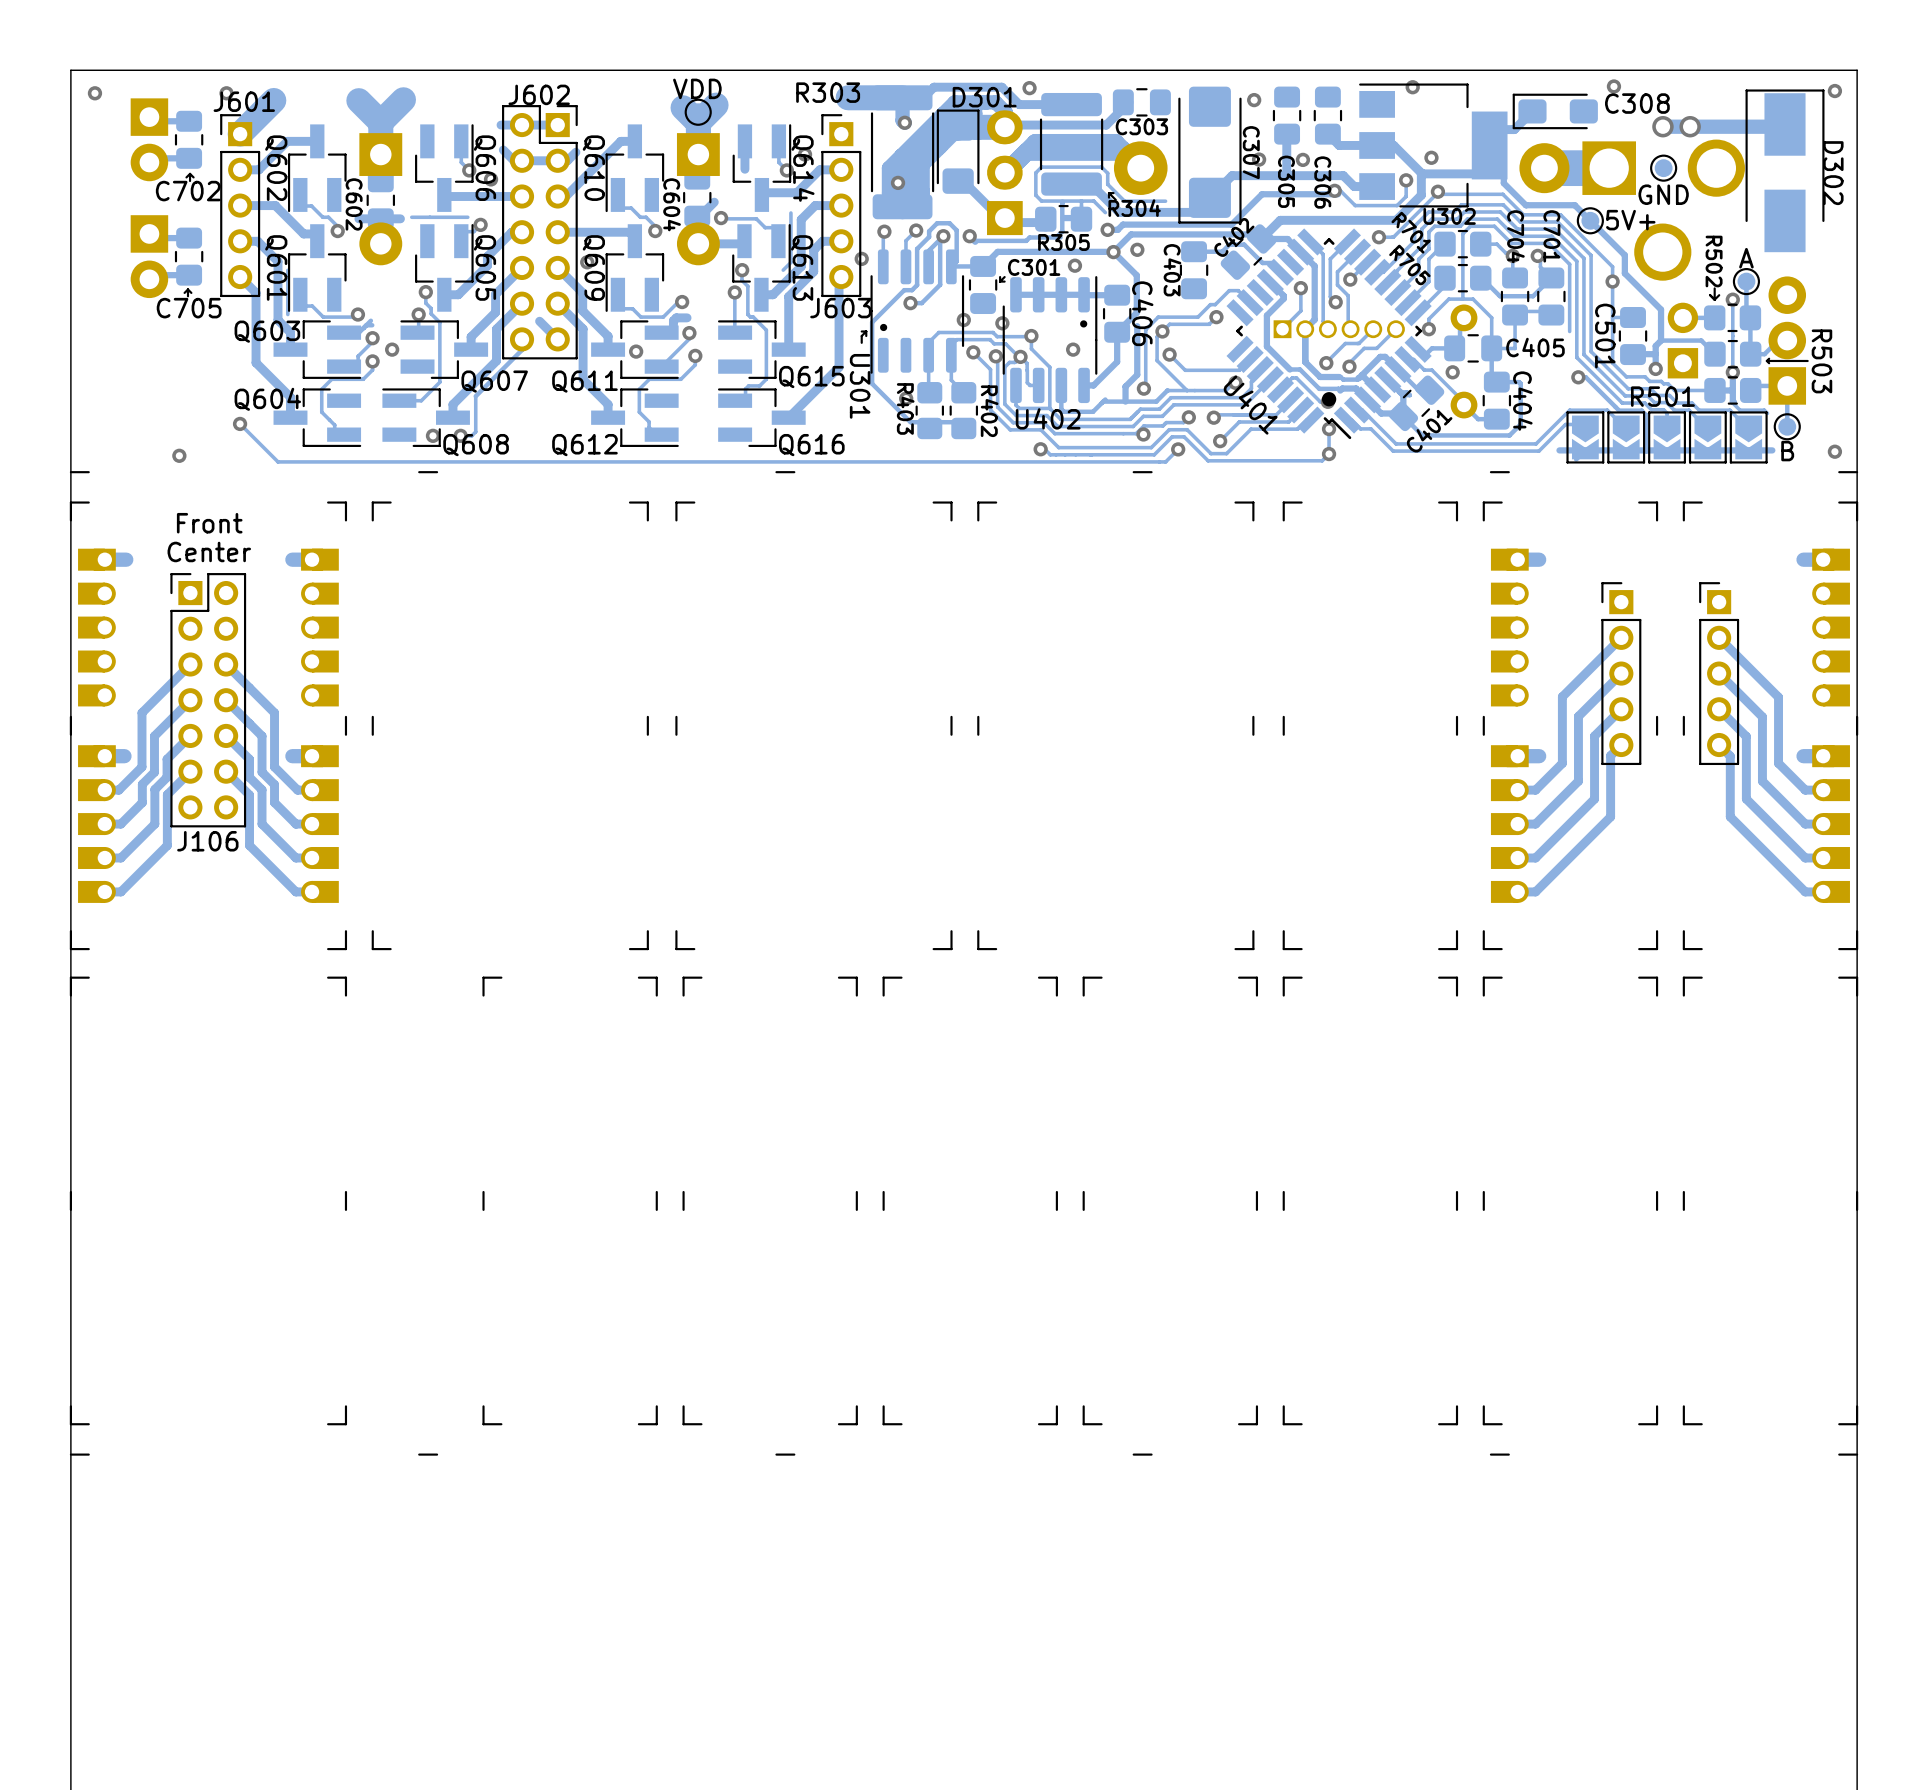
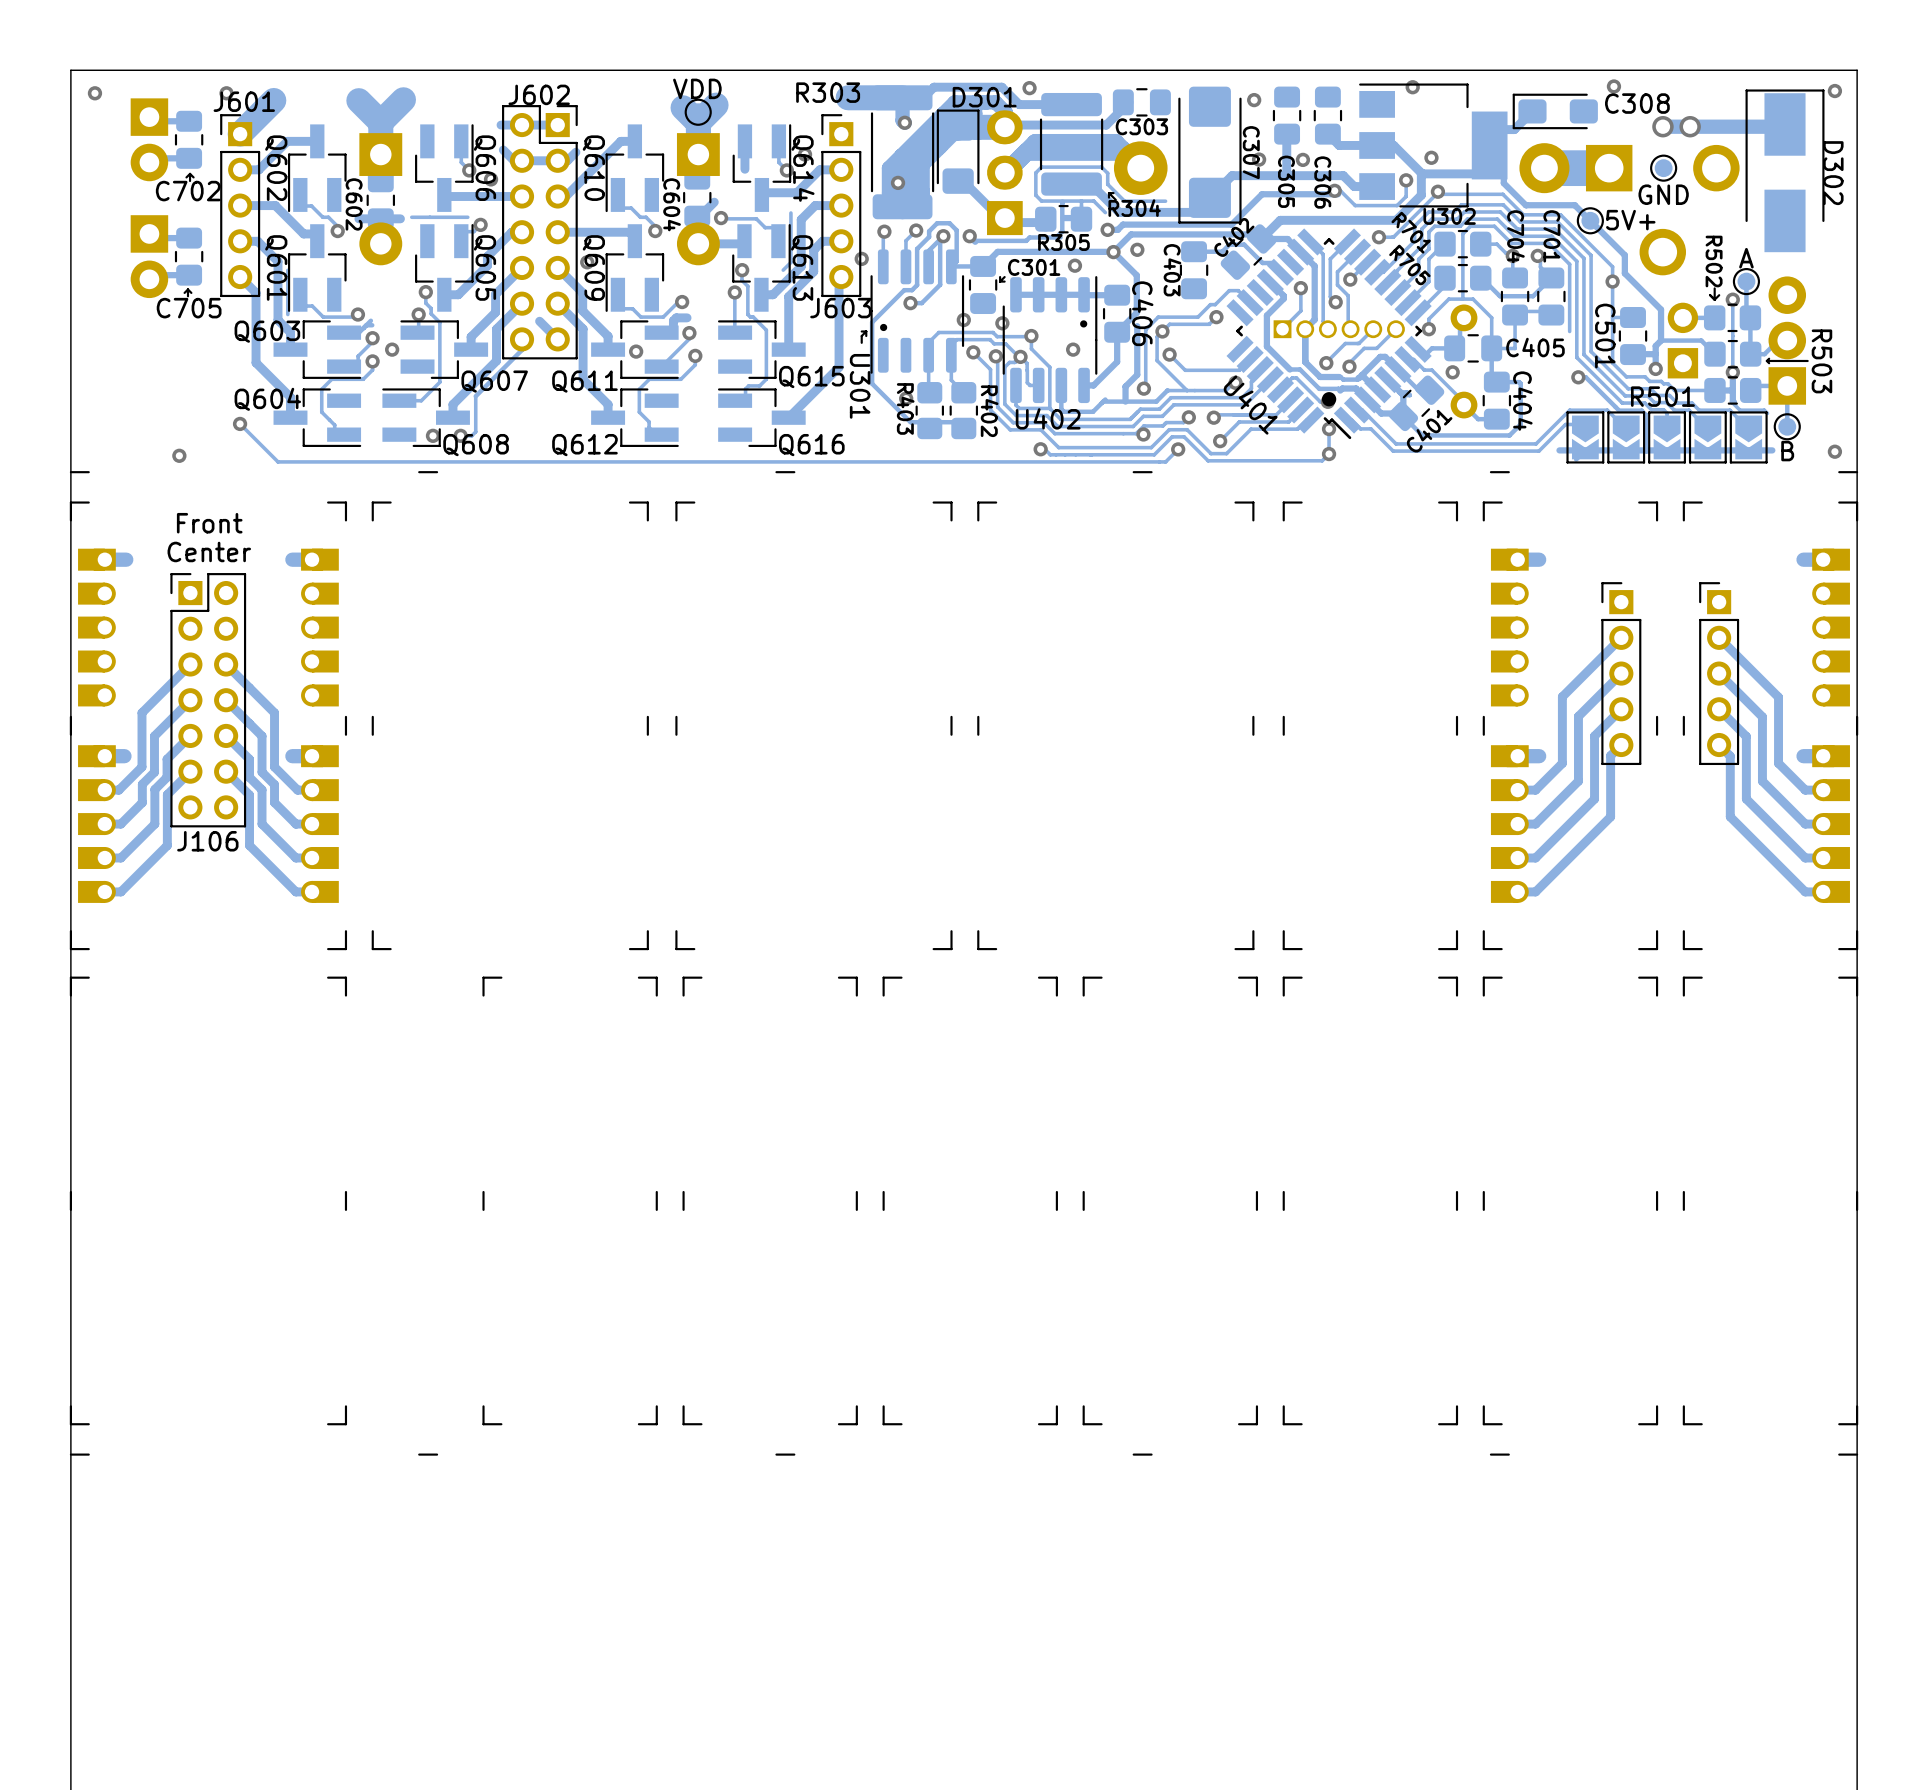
part footprint: [1582, 139, 1745, 281] -> [1585, 144, 1740, 276]

